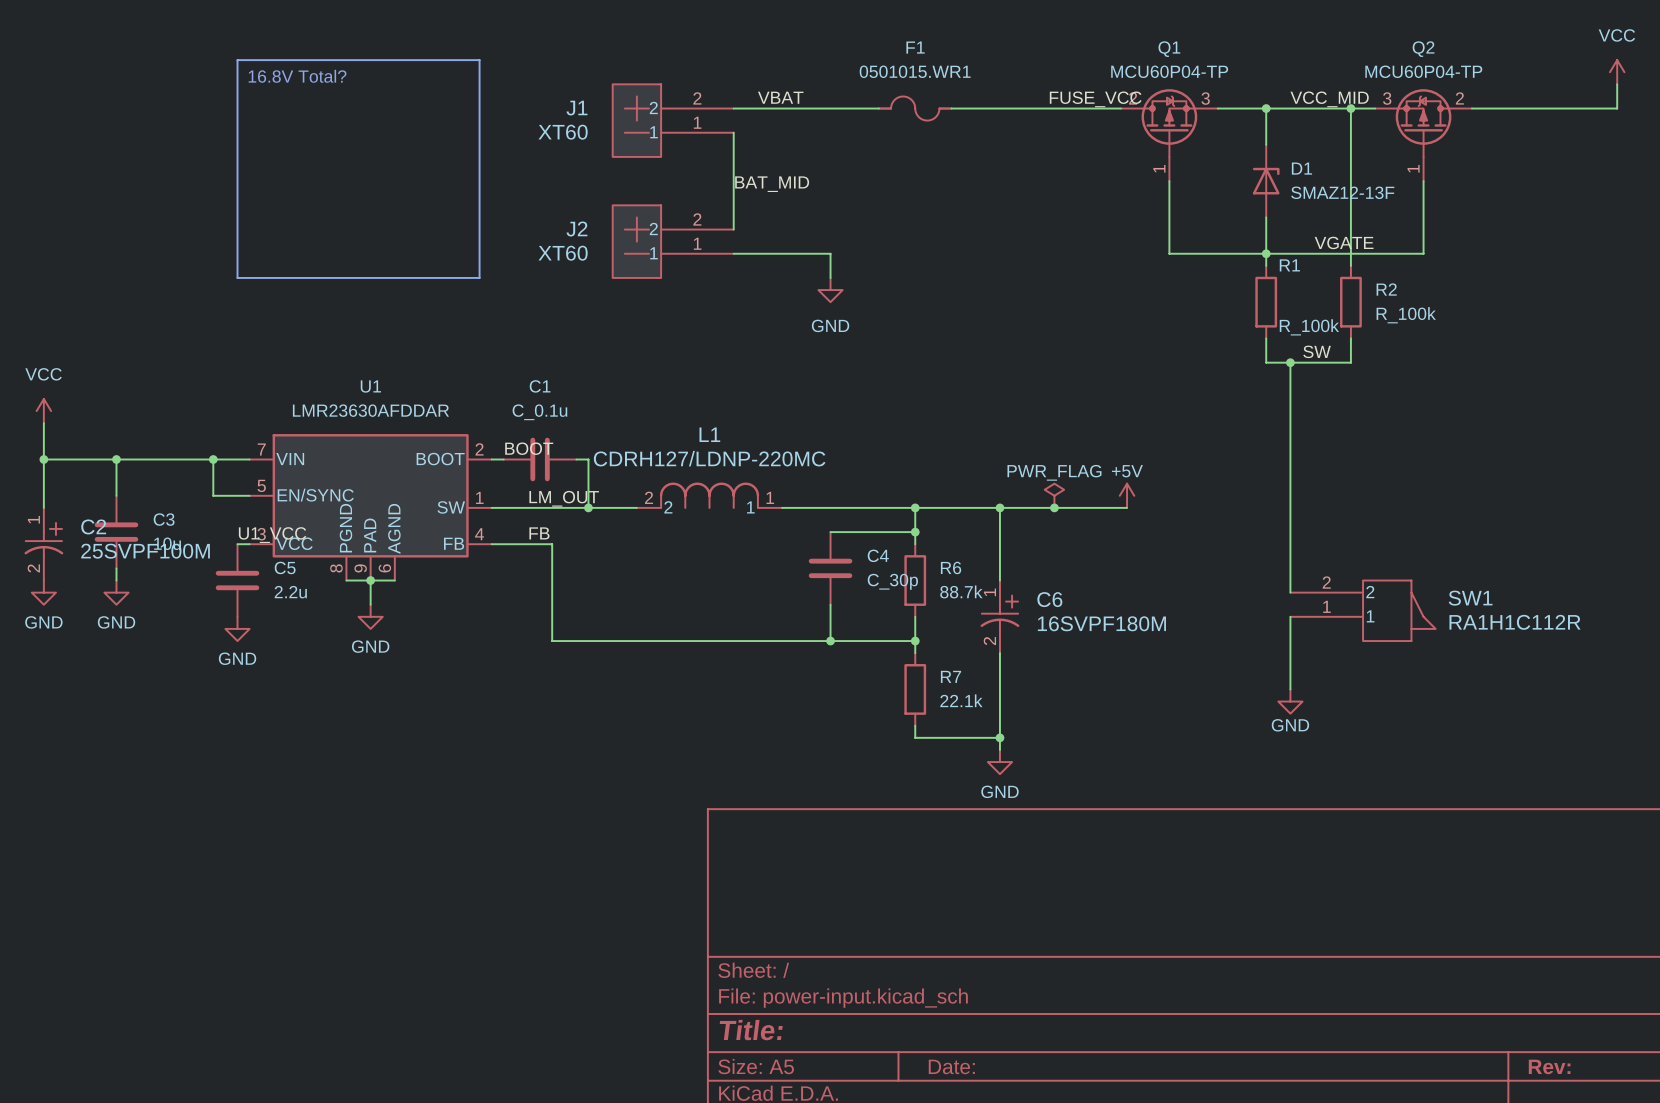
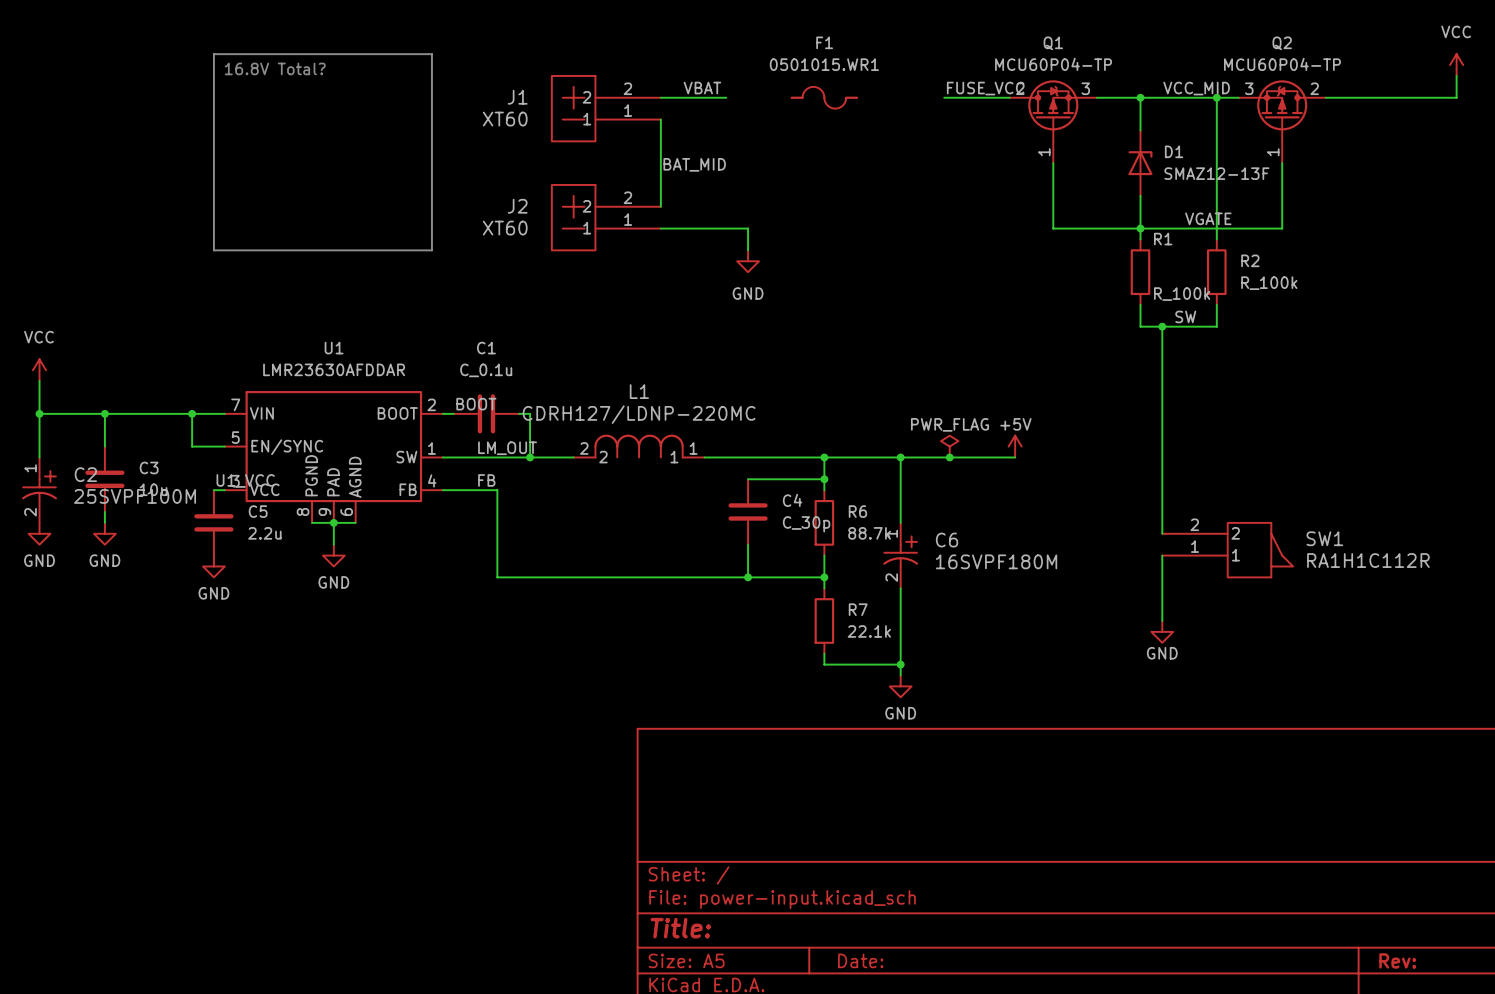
wire: (806, 108) (878, 108) -> none
wire: (951, 108) (1048, 108) -> none

